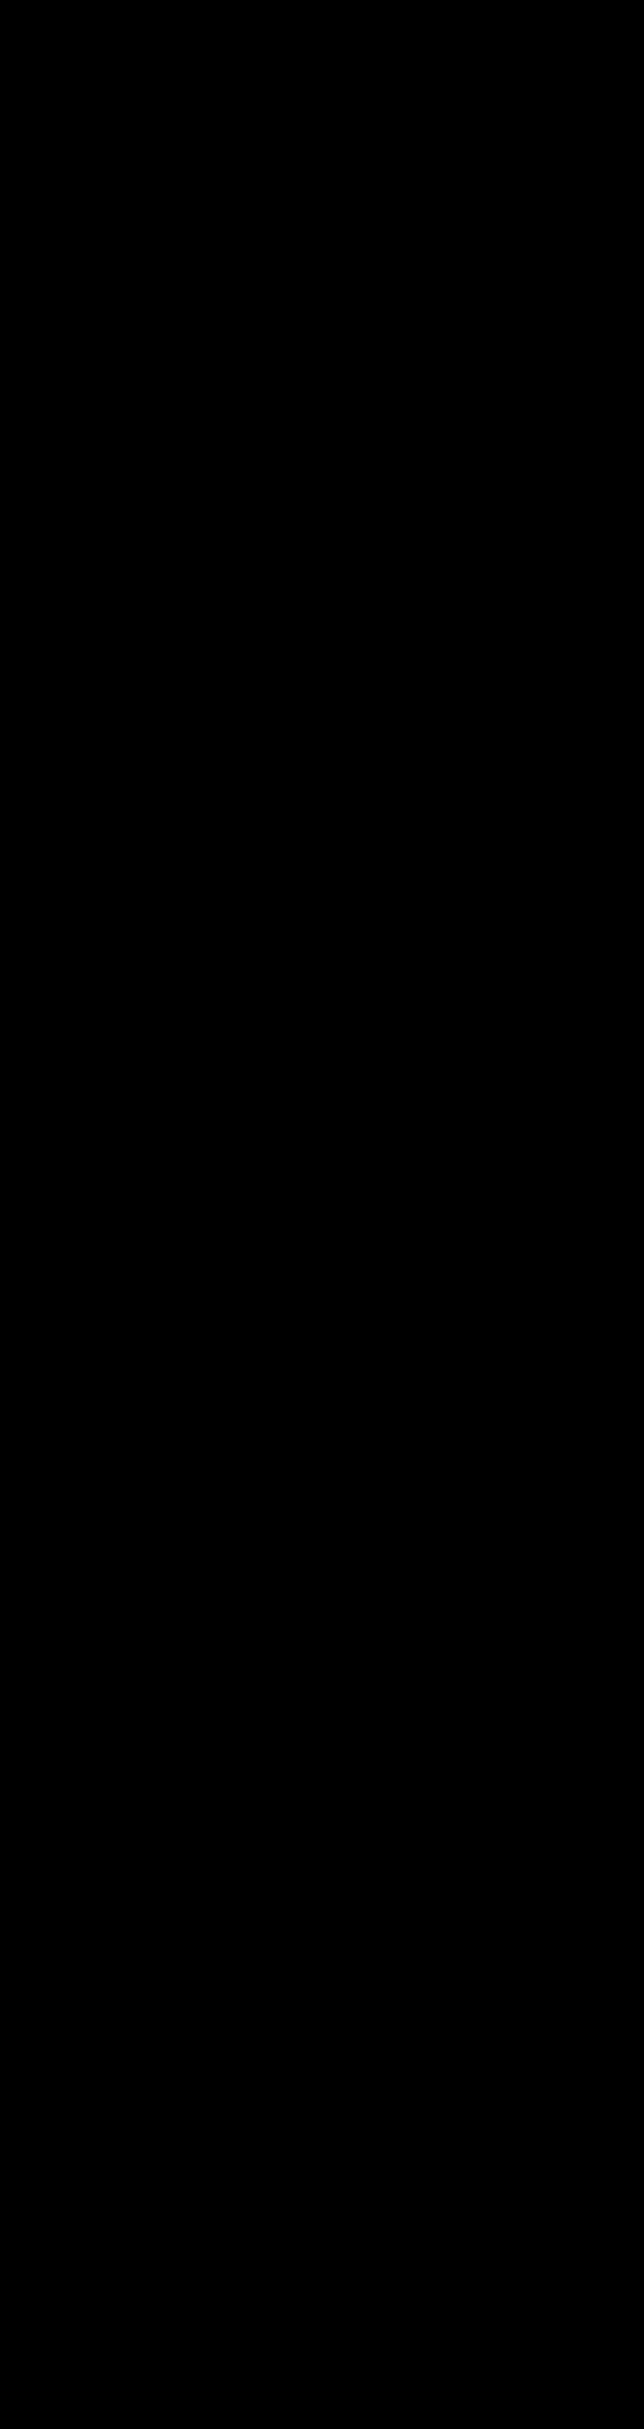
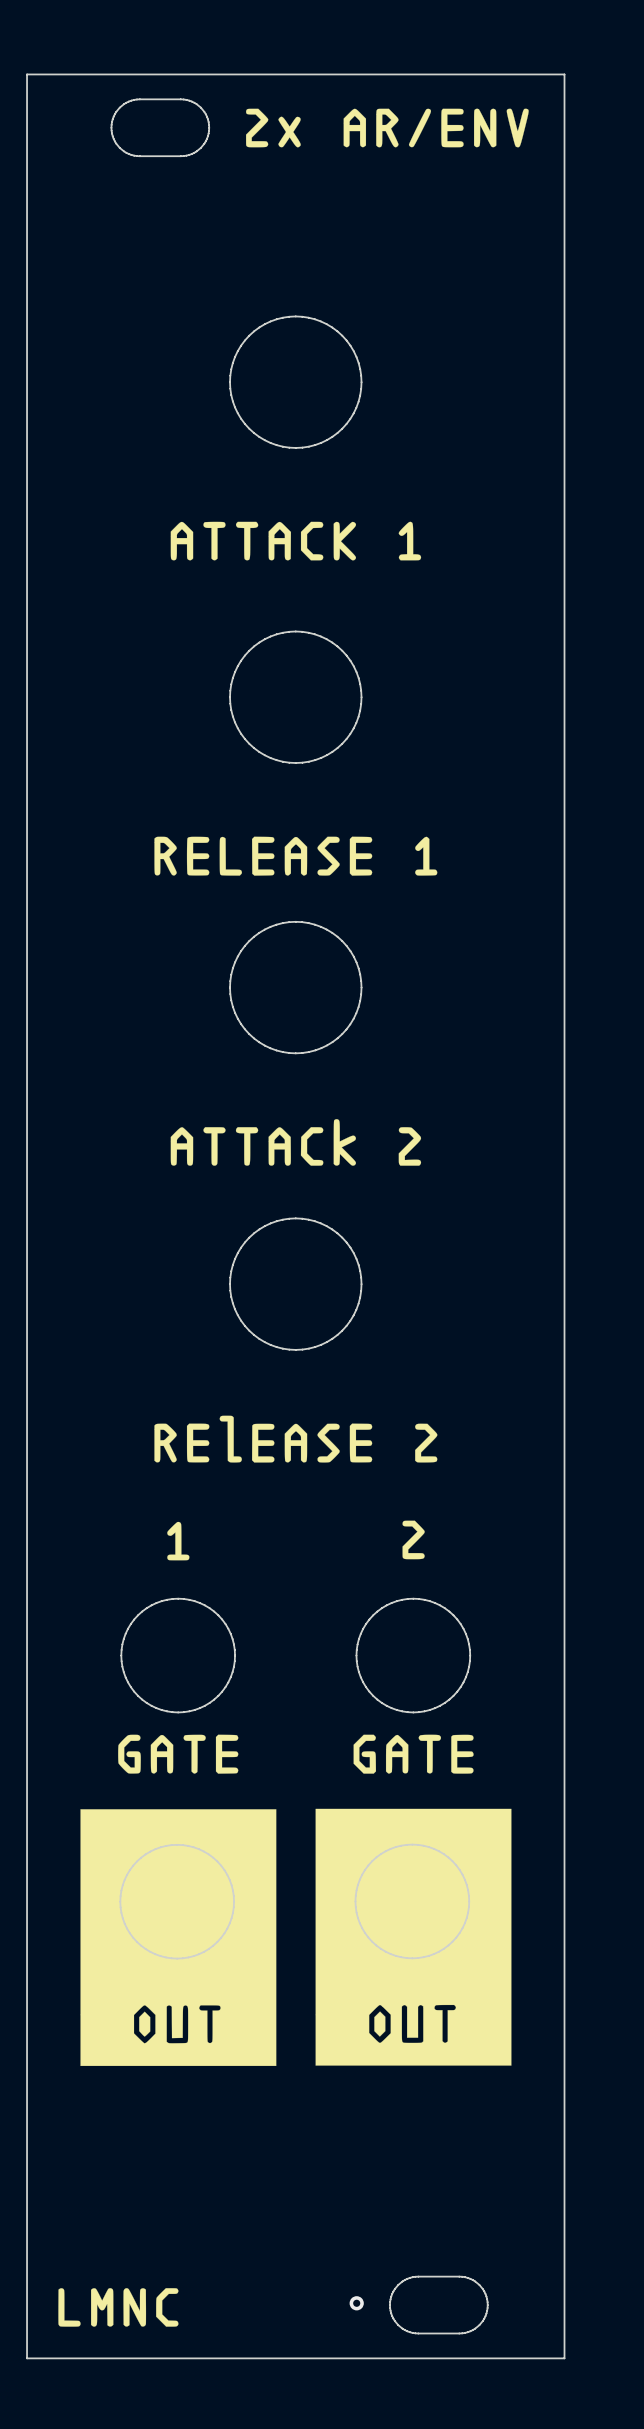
drawing: none -> [26, 73, 566, 2360]
via: none -> (356, 2303)

